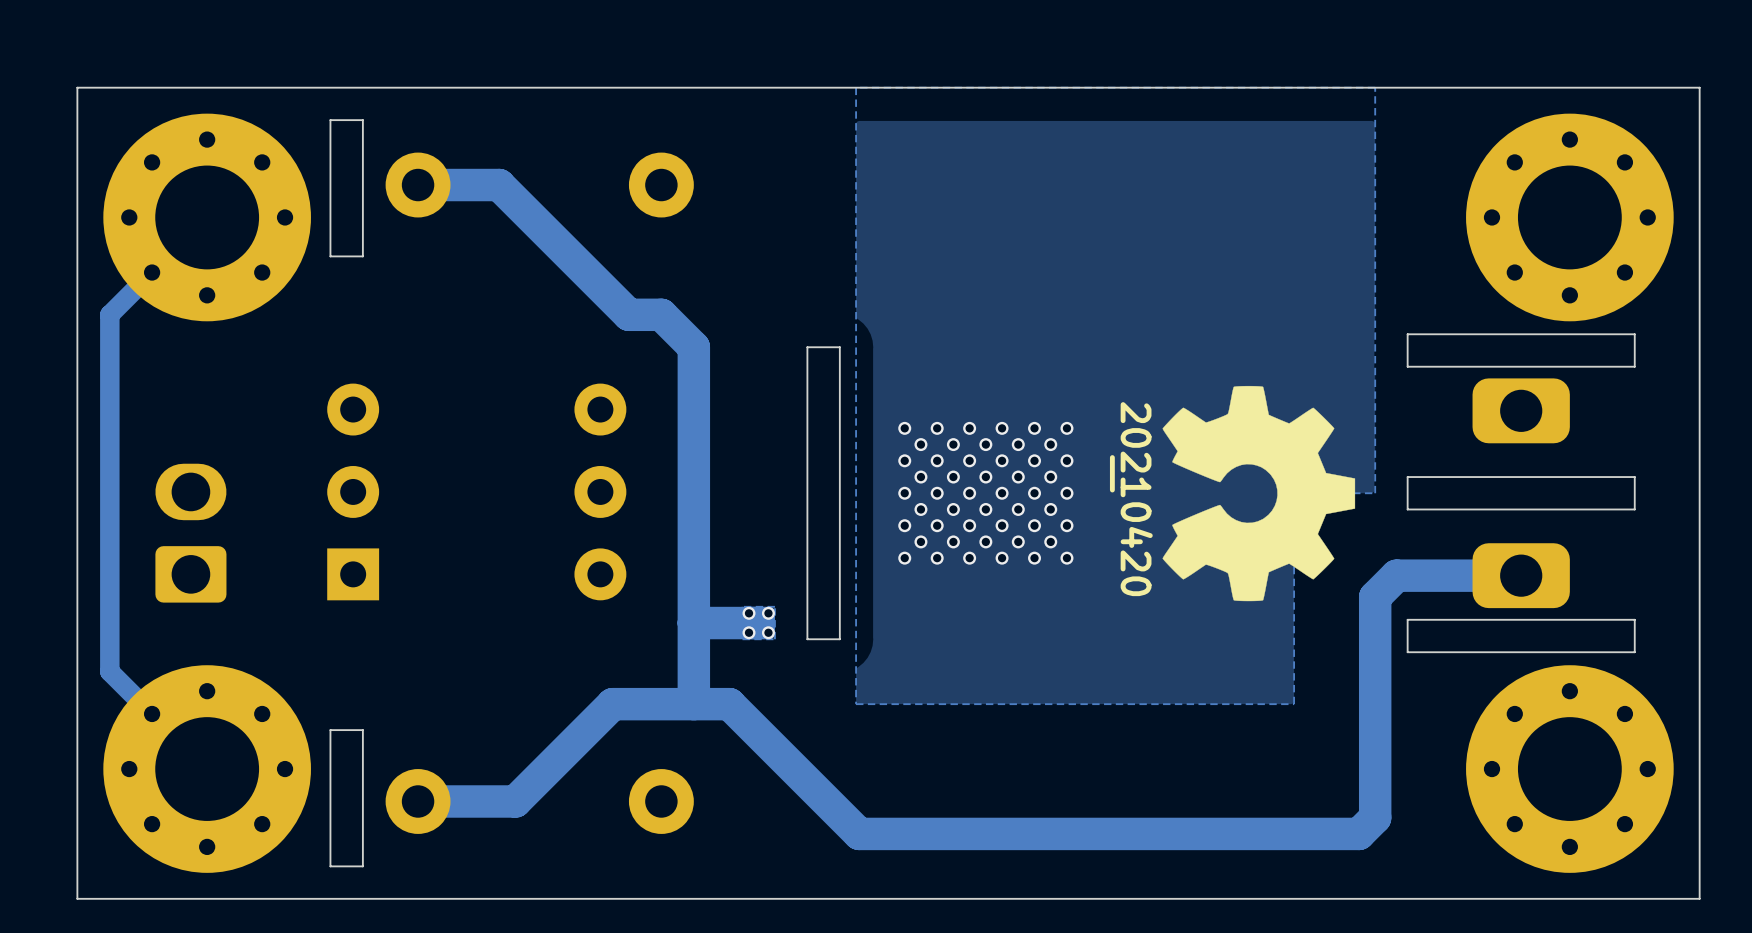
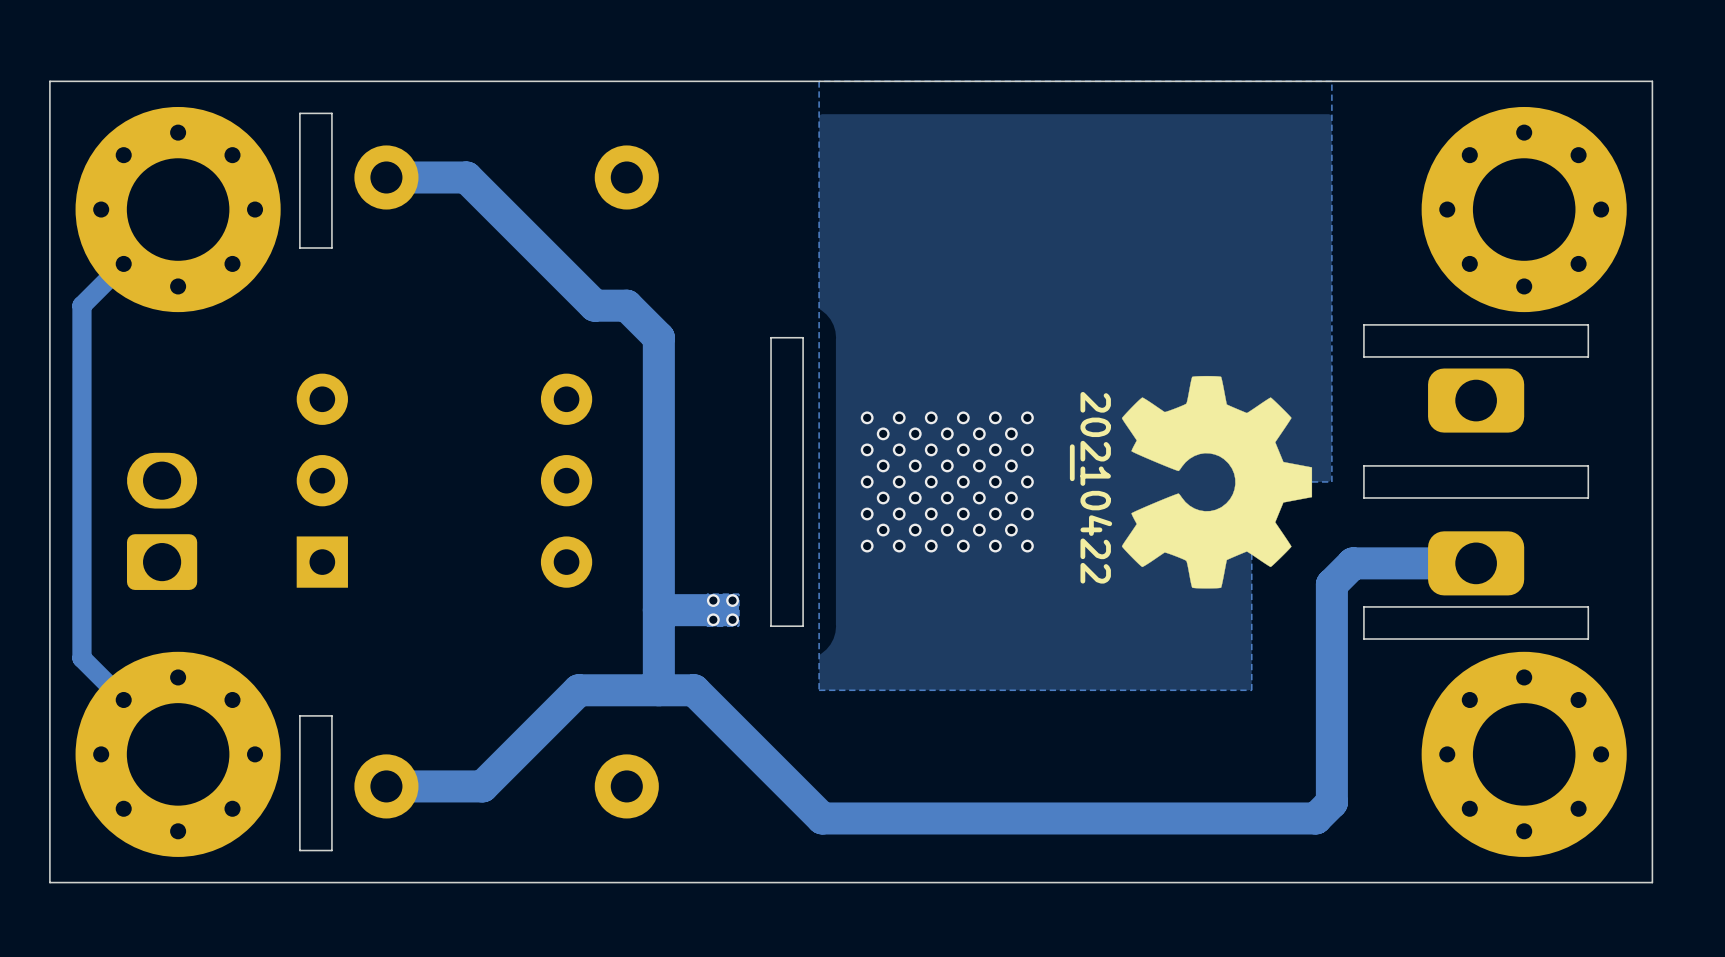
drawing shape: [1109, 402, 1153, 597] -> [1069, 391, 1113, 584]

